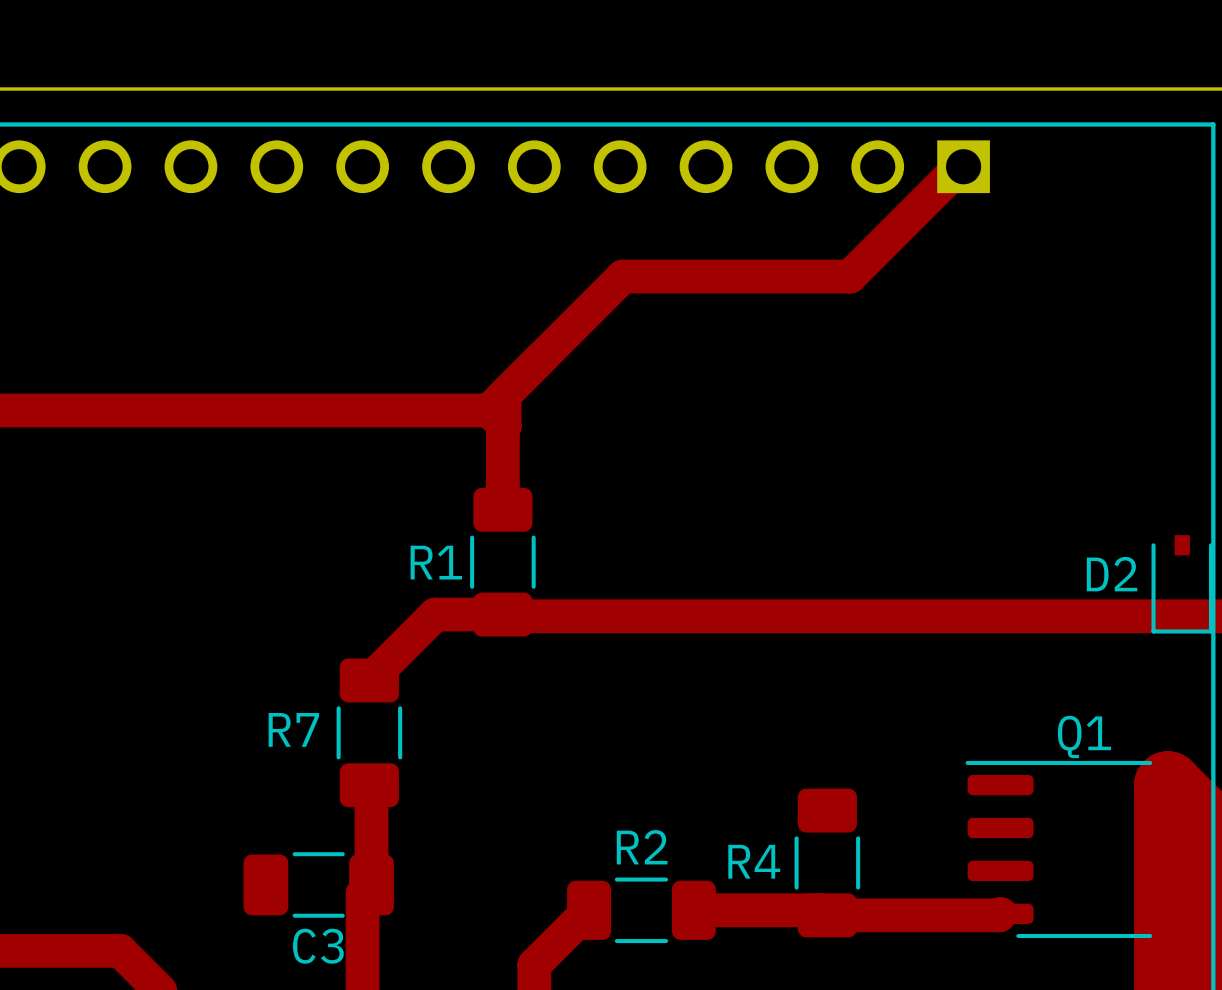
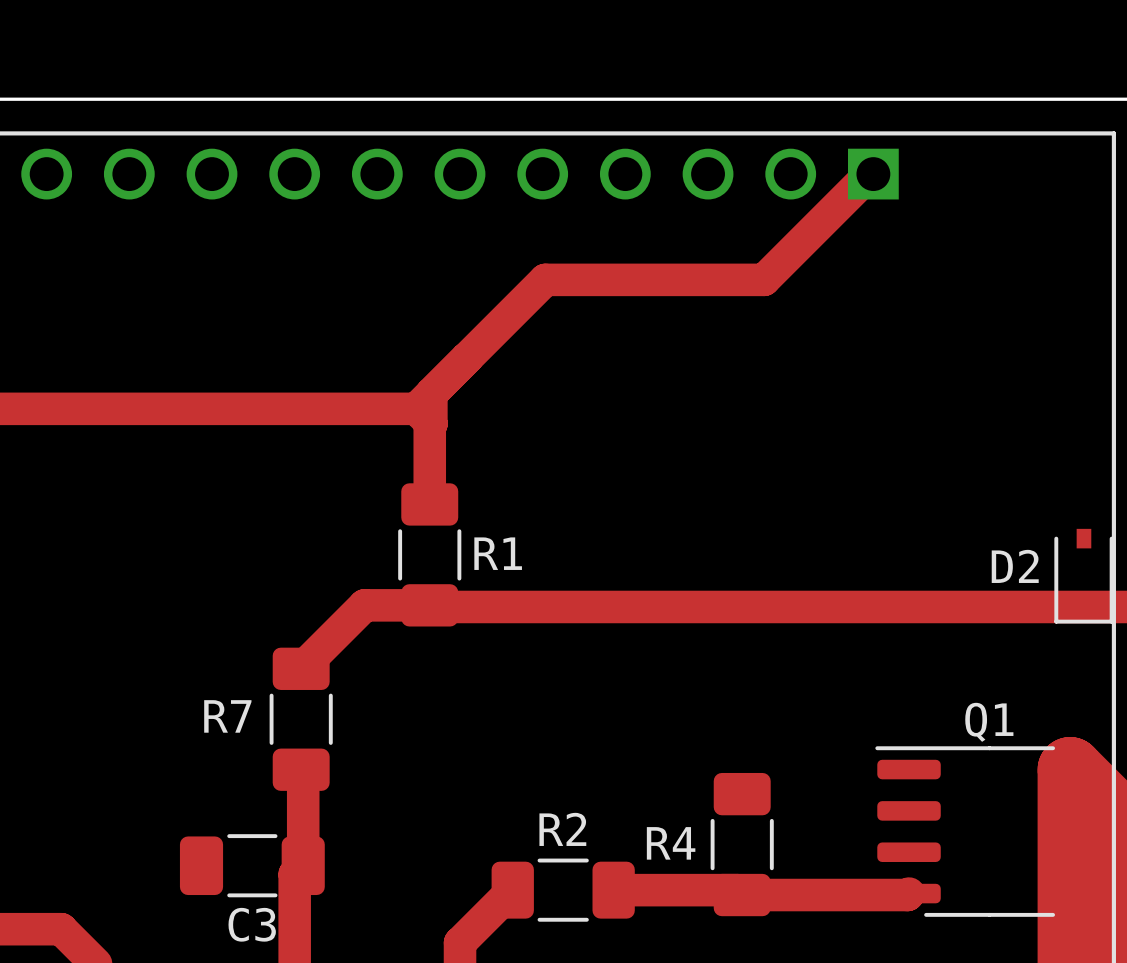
R1 name position: R1 (436, 562) -> R1 (498, 553)

